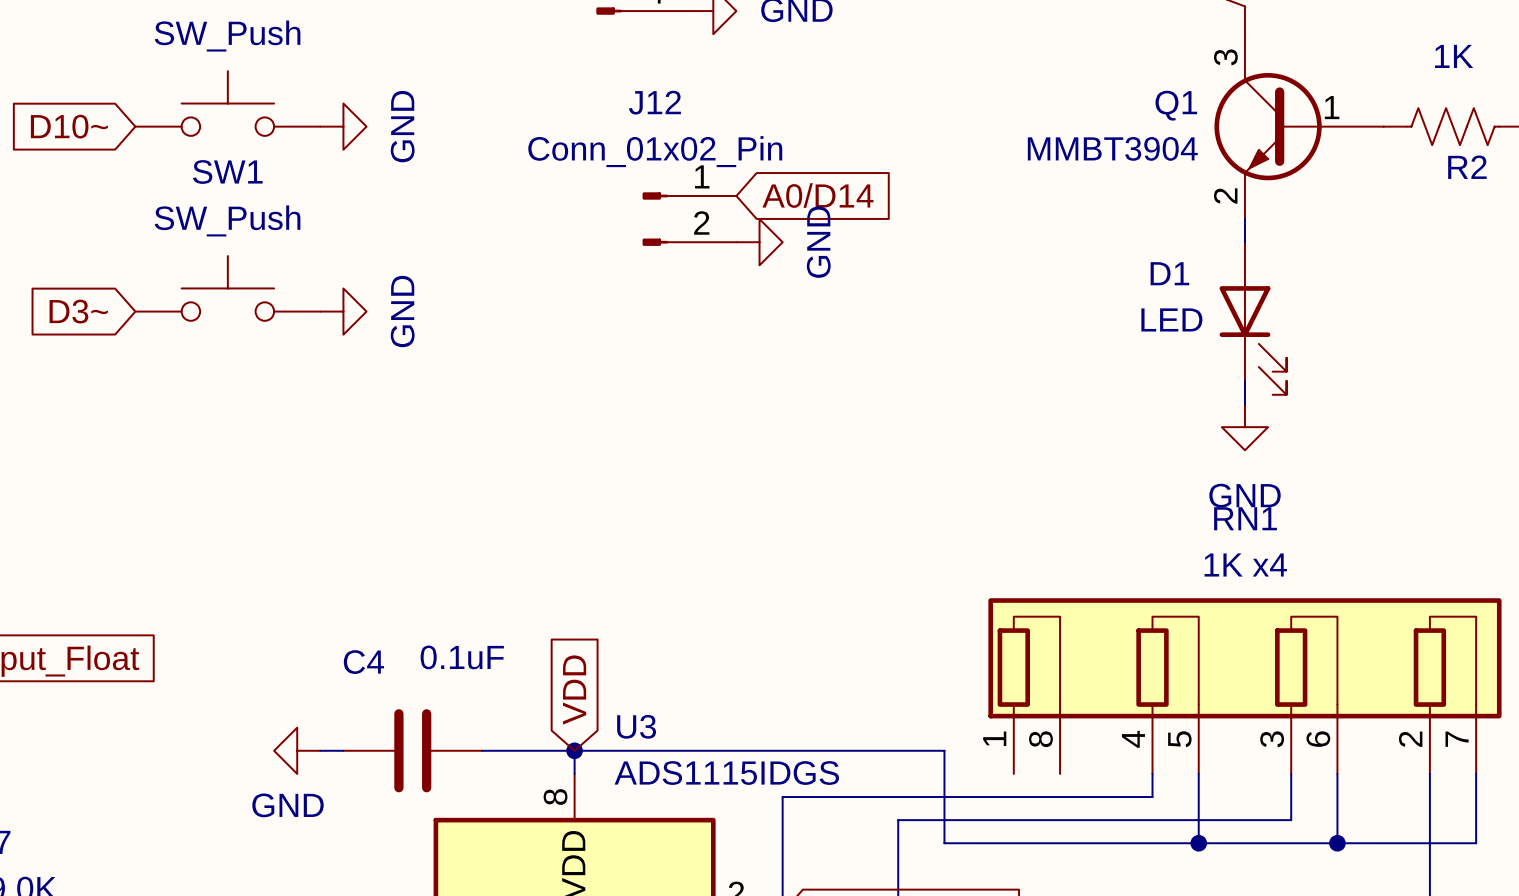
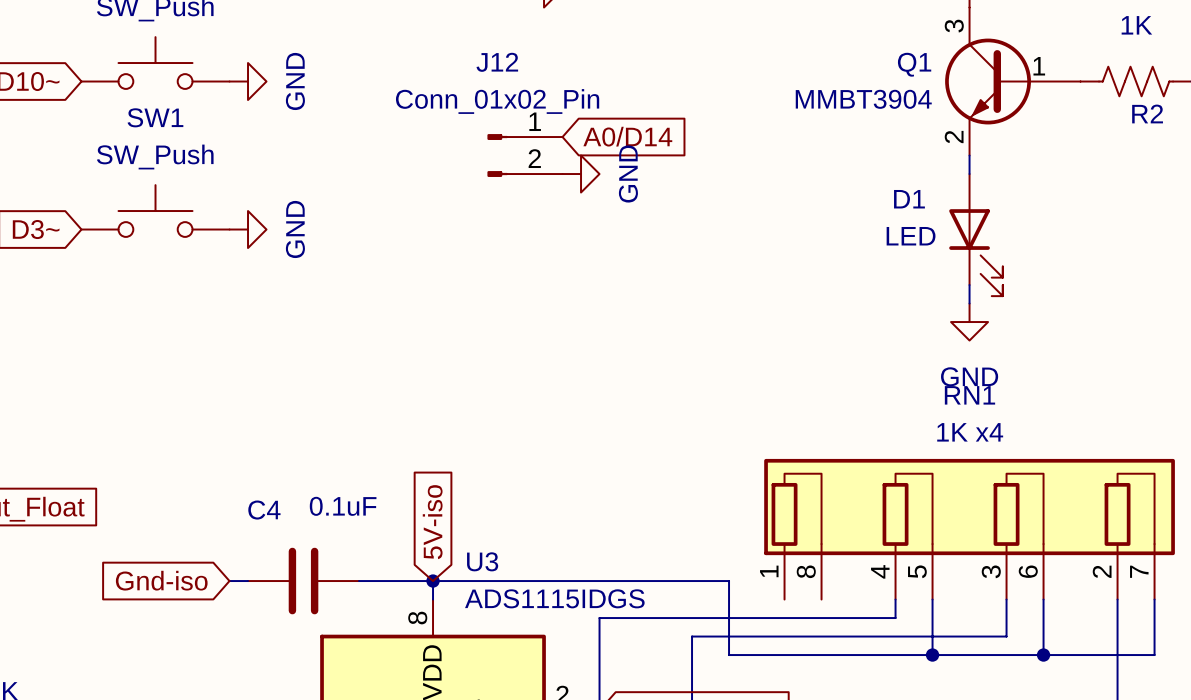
global label: VDD (574, 690) -> 5V-iso (432, 522)
global label: none -> Gnd-iso (161, 580)
power symbol: GND (297, 750) -> none

